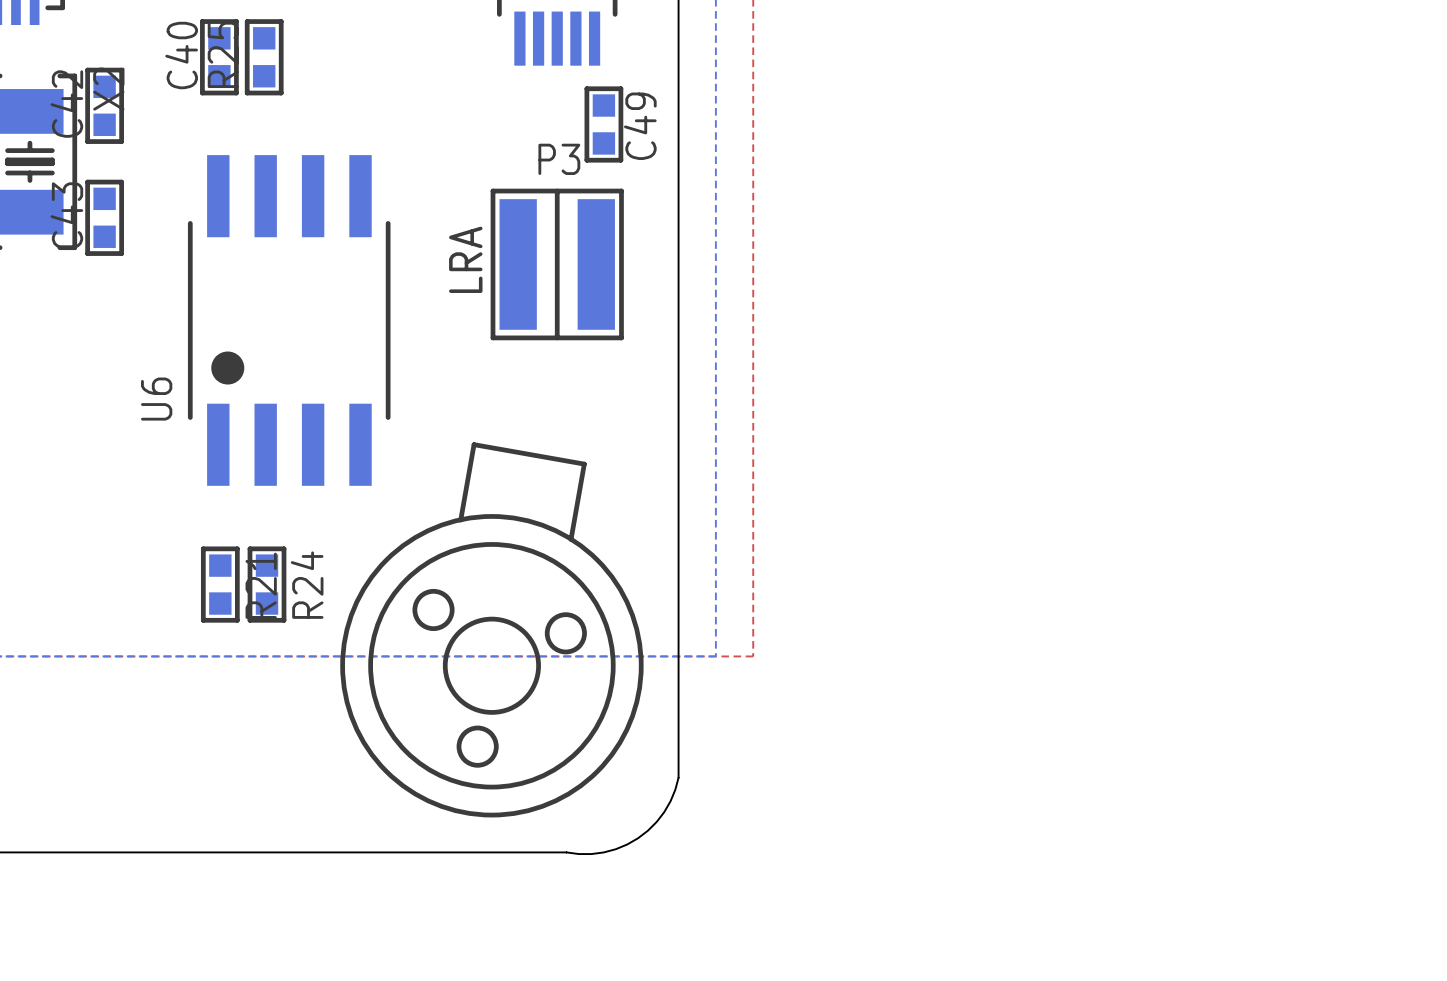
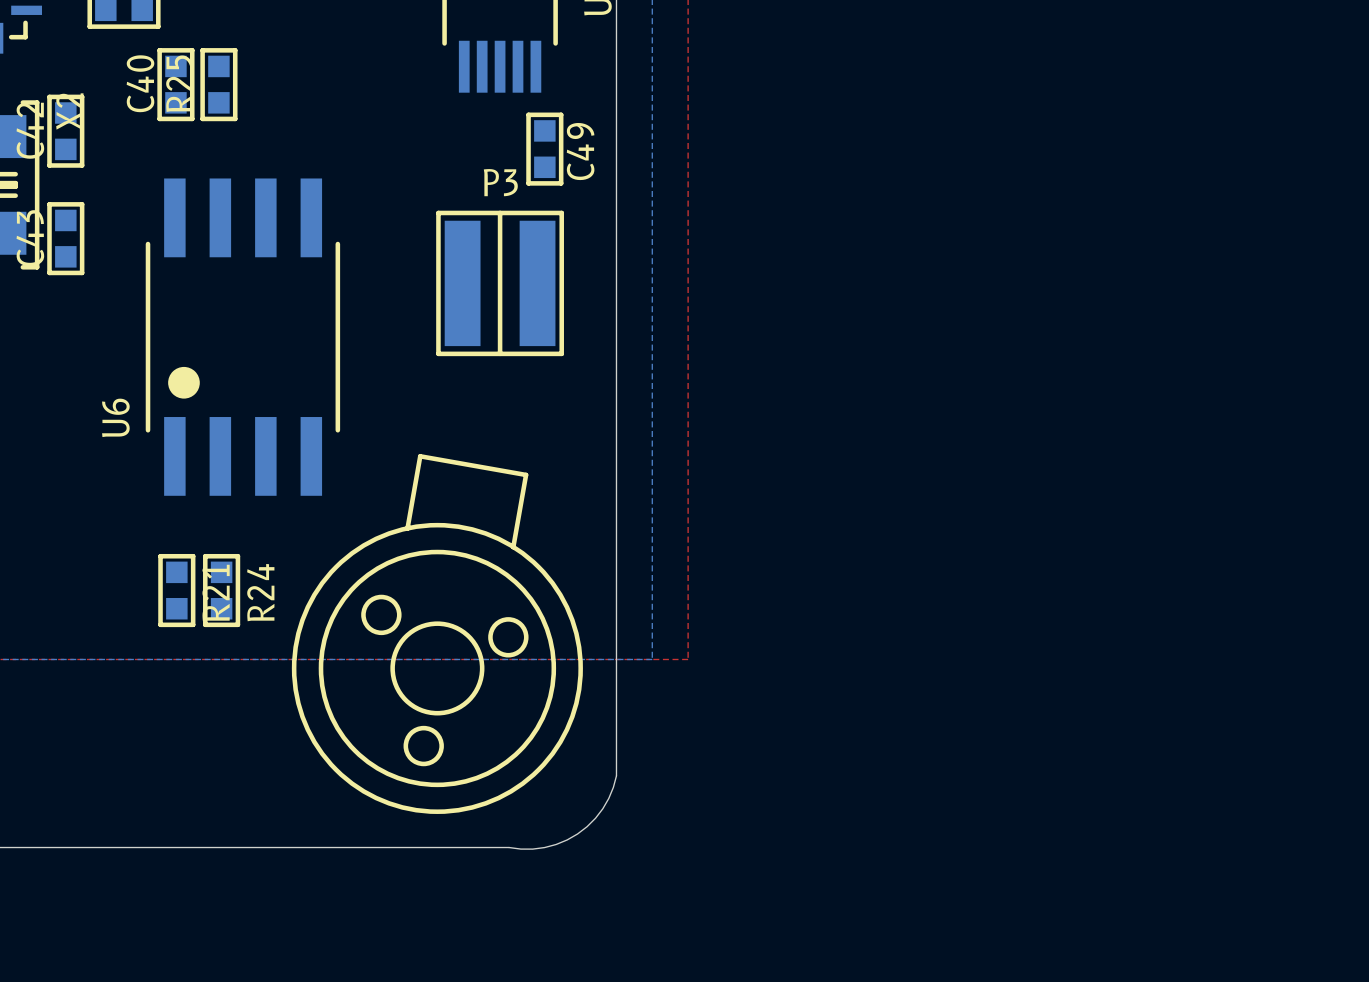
text: LRA (465, 259) -> none

